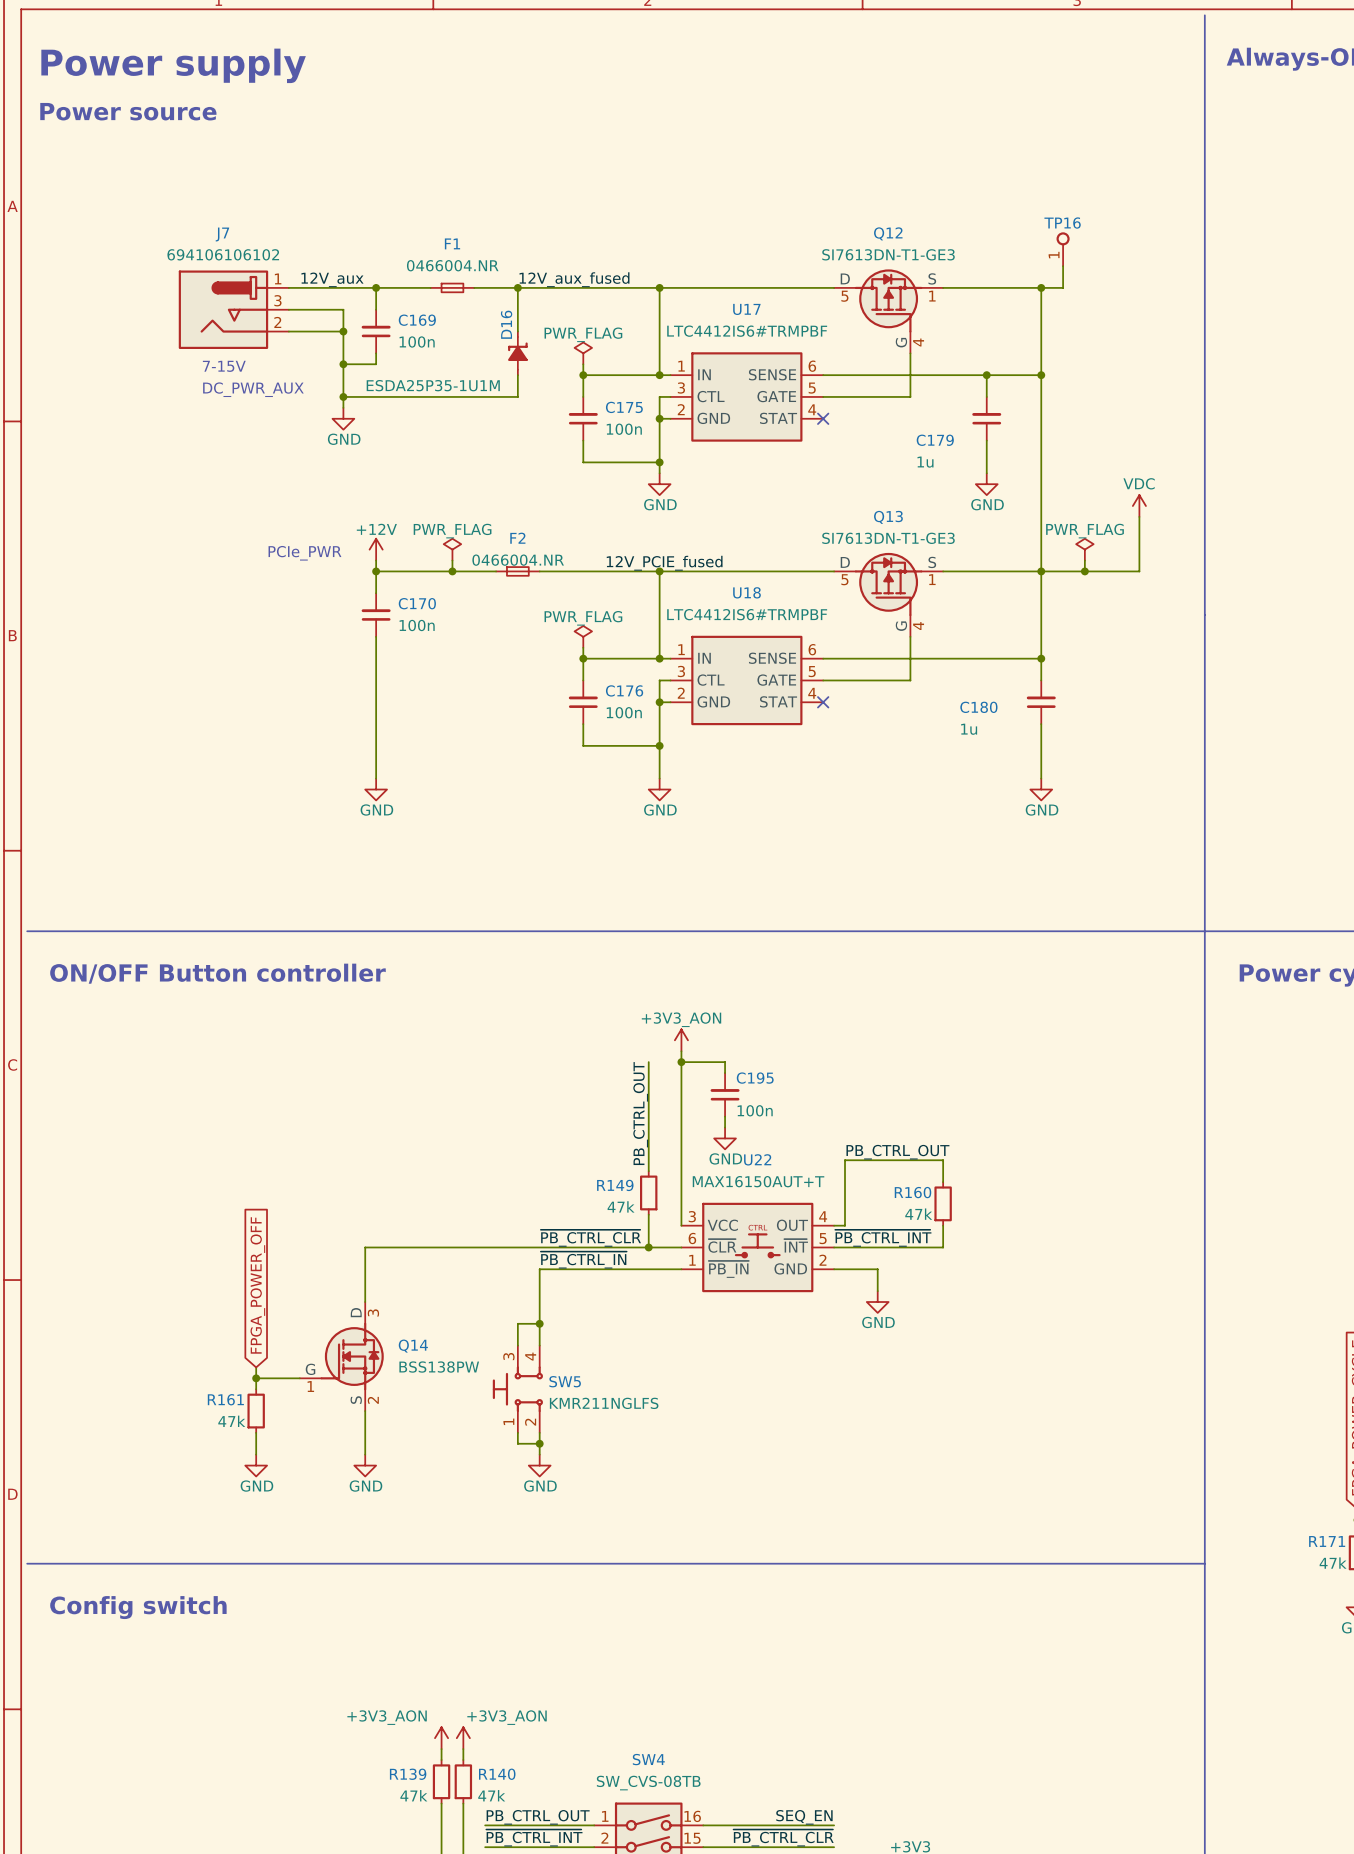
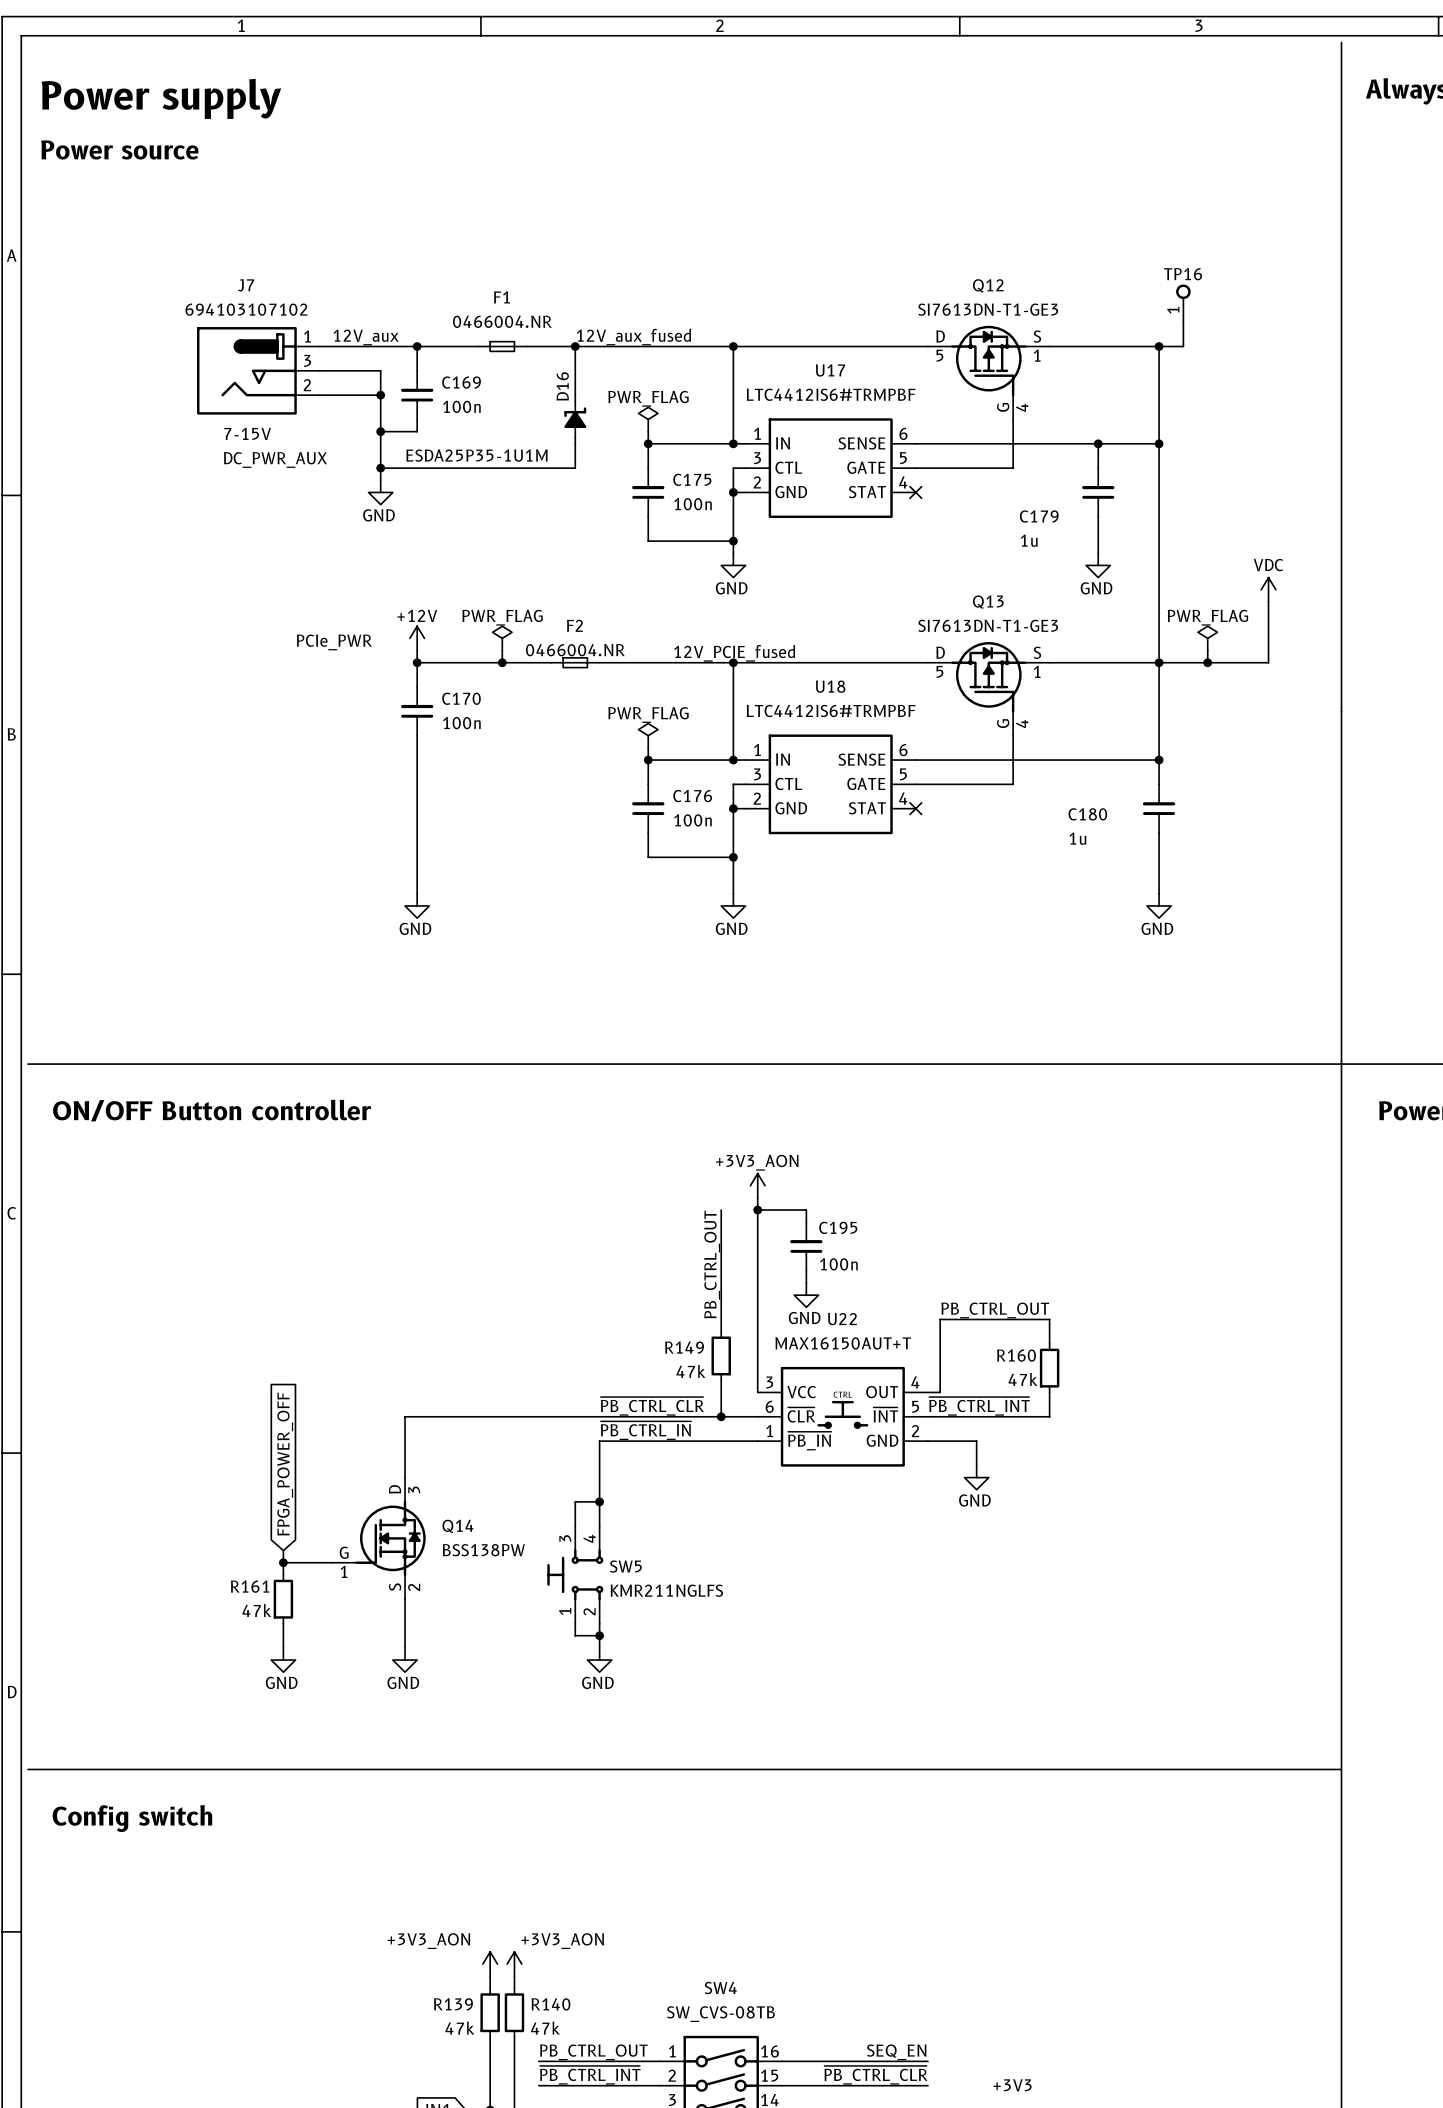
J7 text: 694106106102 (223, 254) -> 694103107102 (246, 309)

